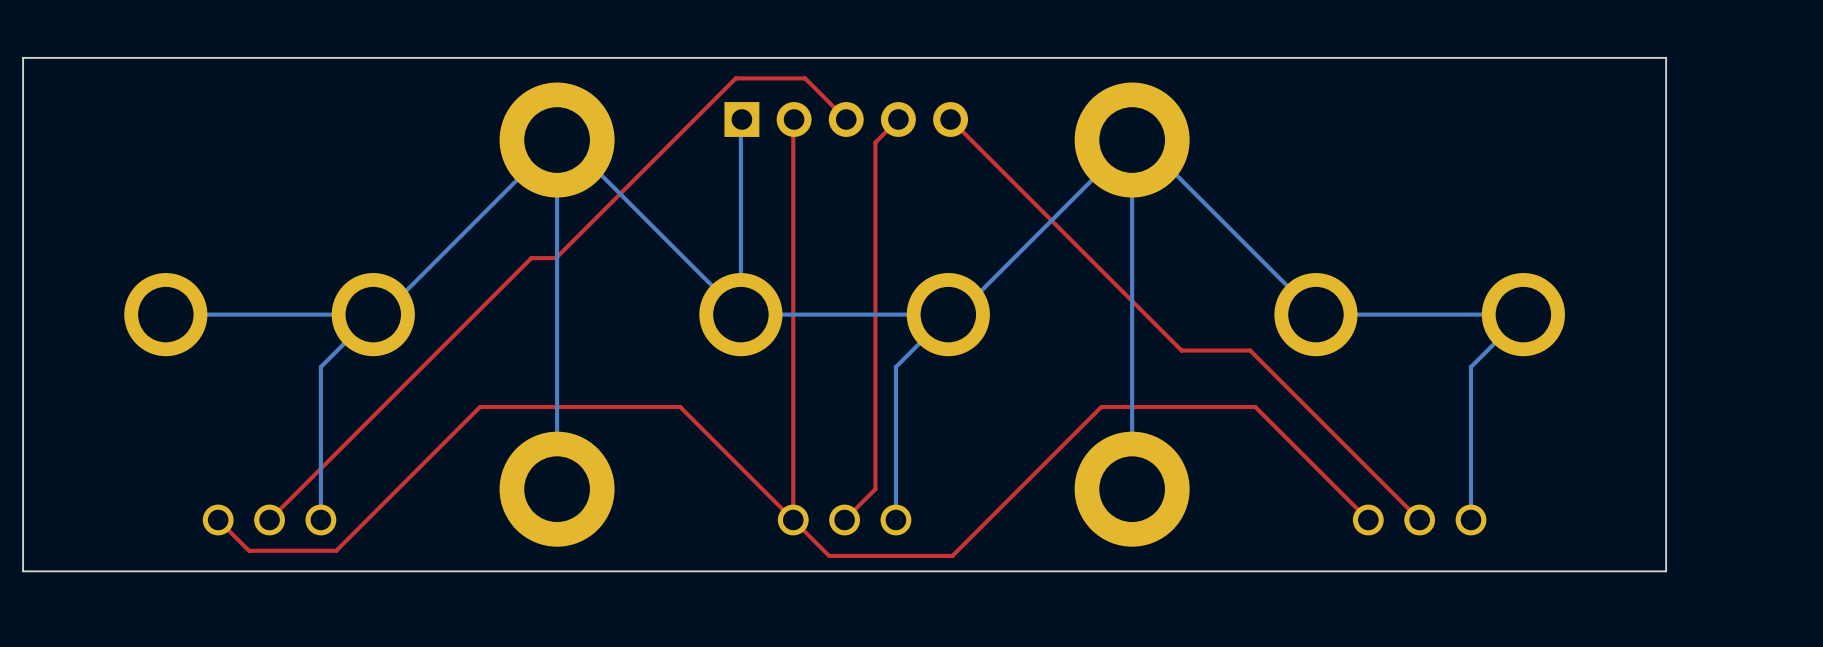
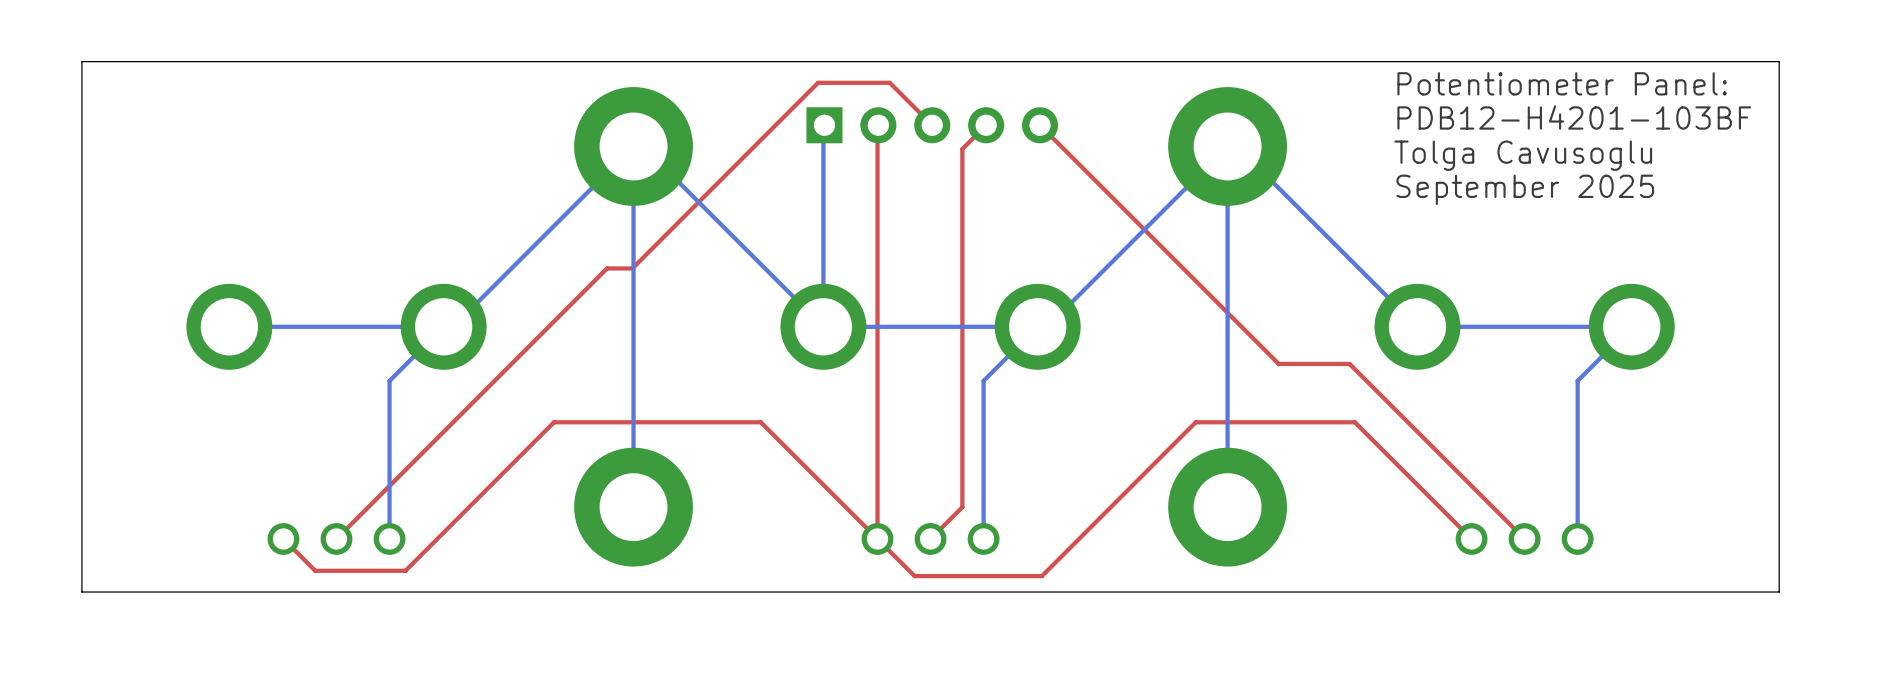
text: none -> Potentiometer Panel: (1562, 83)
text: none -> PDB12-H4201-103BF (1574, 117)
text: none -> Tolga Cavusoglu (1523, 155)
text: none -> September 2025 (1525, 189)

